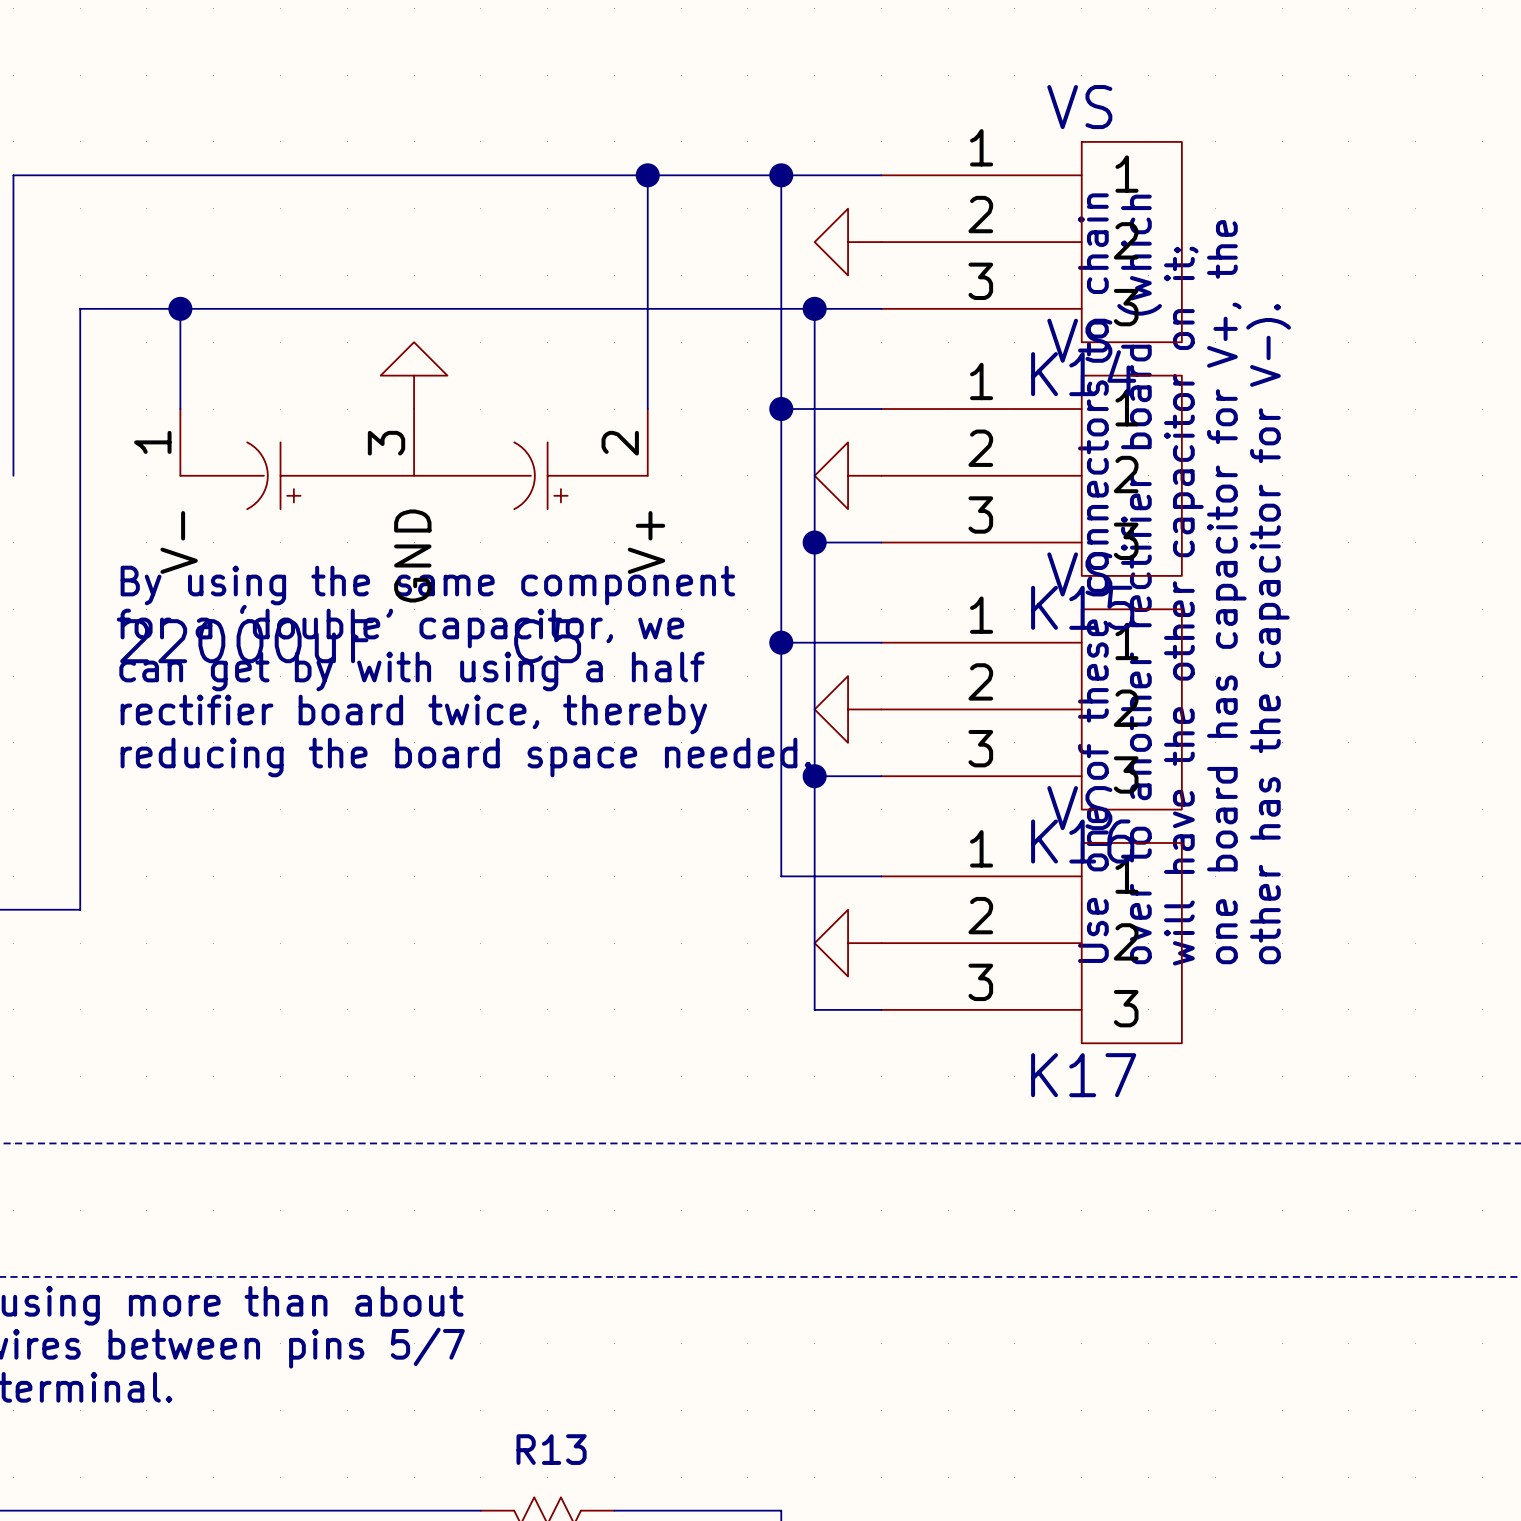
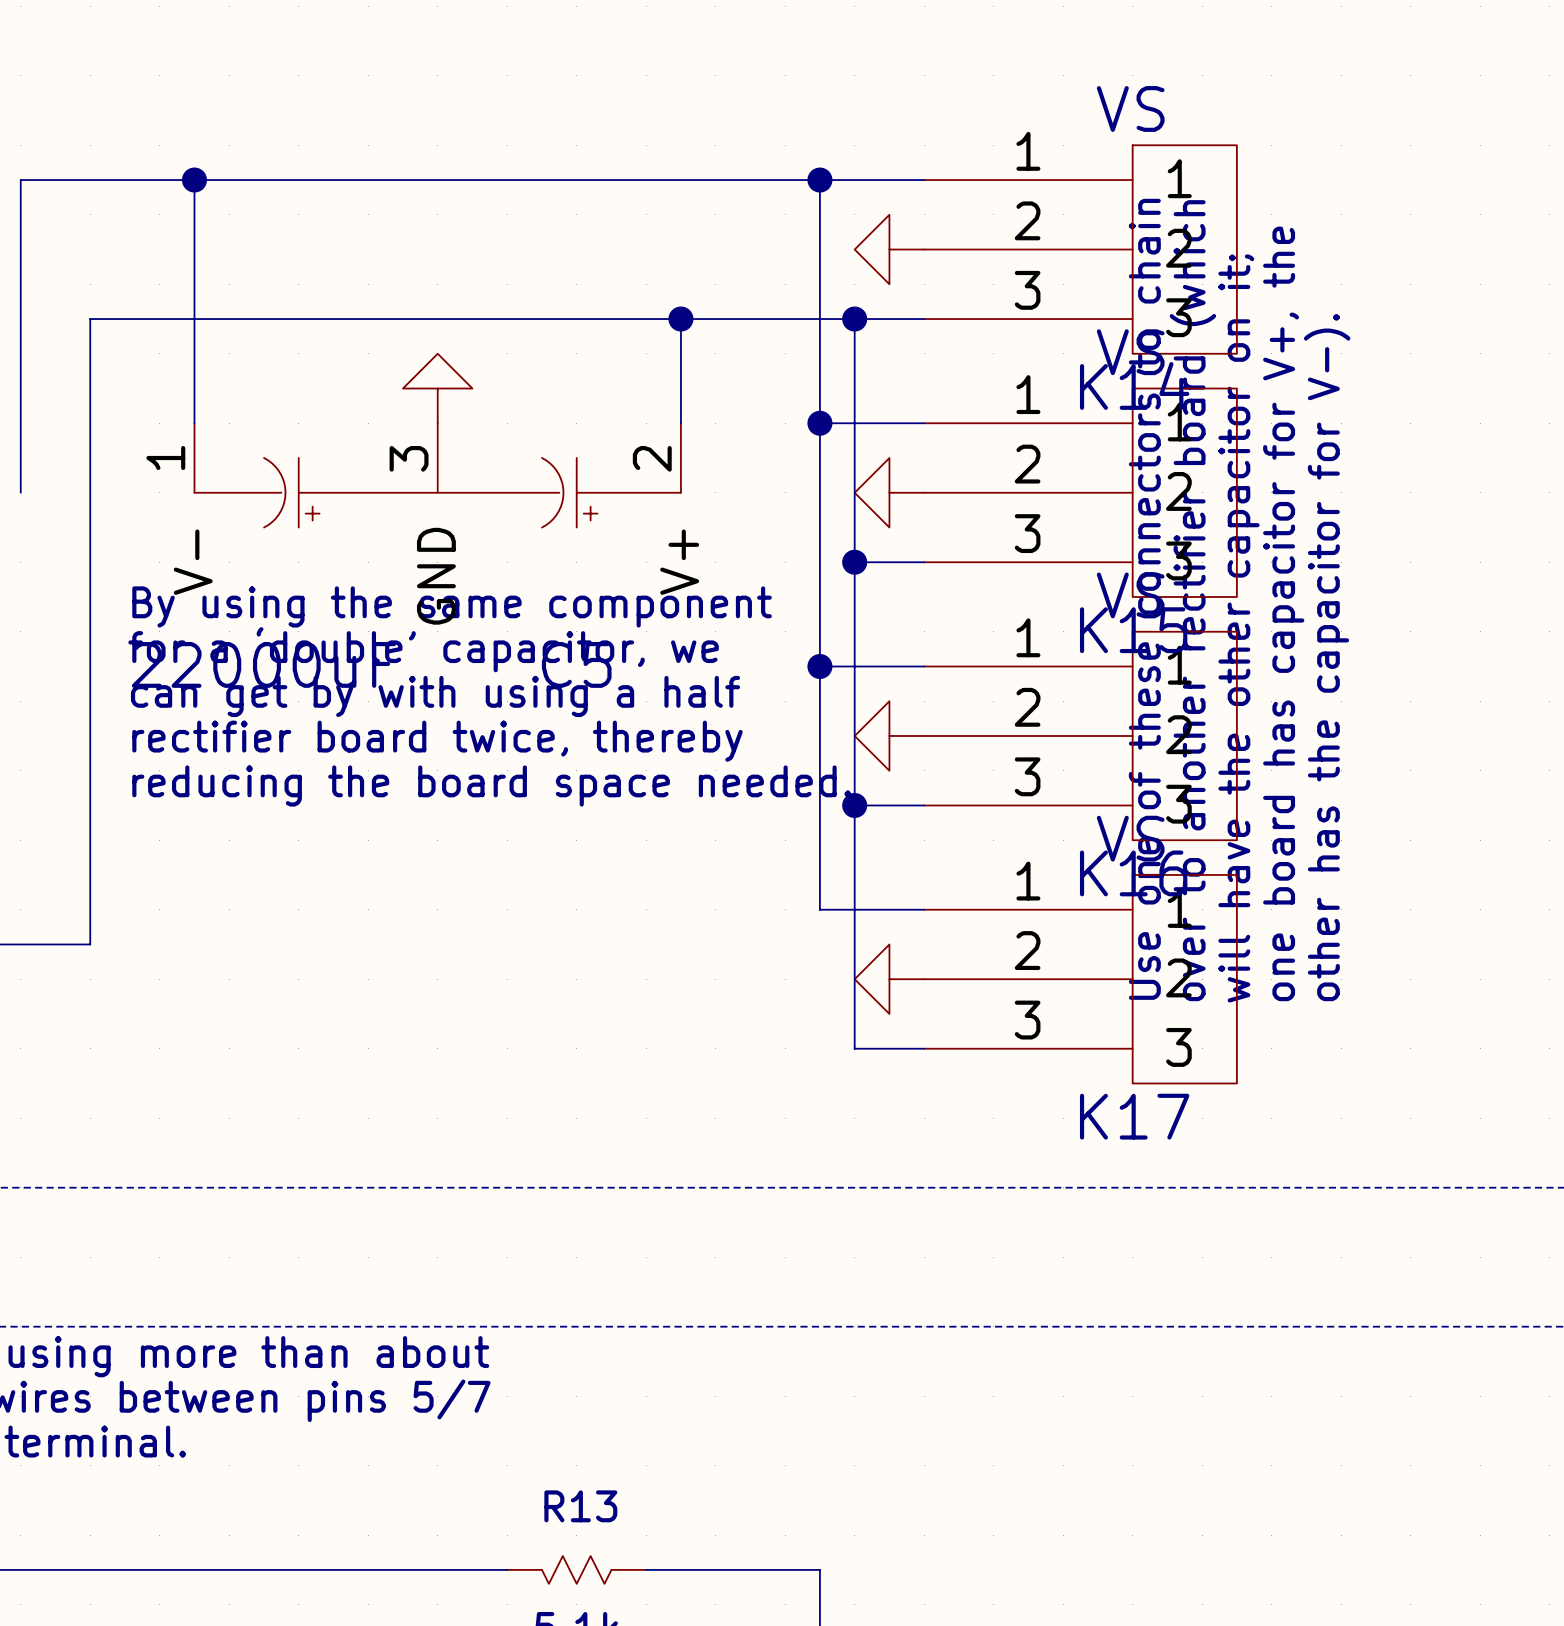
wire: (647, 175) (647, 308) -> (194, 180) (194, 319)
junction position: (647, 175) -> (680, 319)
junction position: (180, 308) -> (194, 180)

